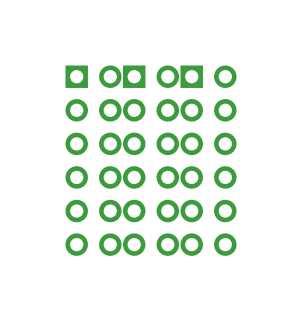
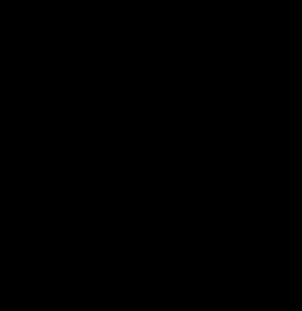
part: (93, 160) -> none
part: (151, 160) -> none
part: (208, 160) -> none

